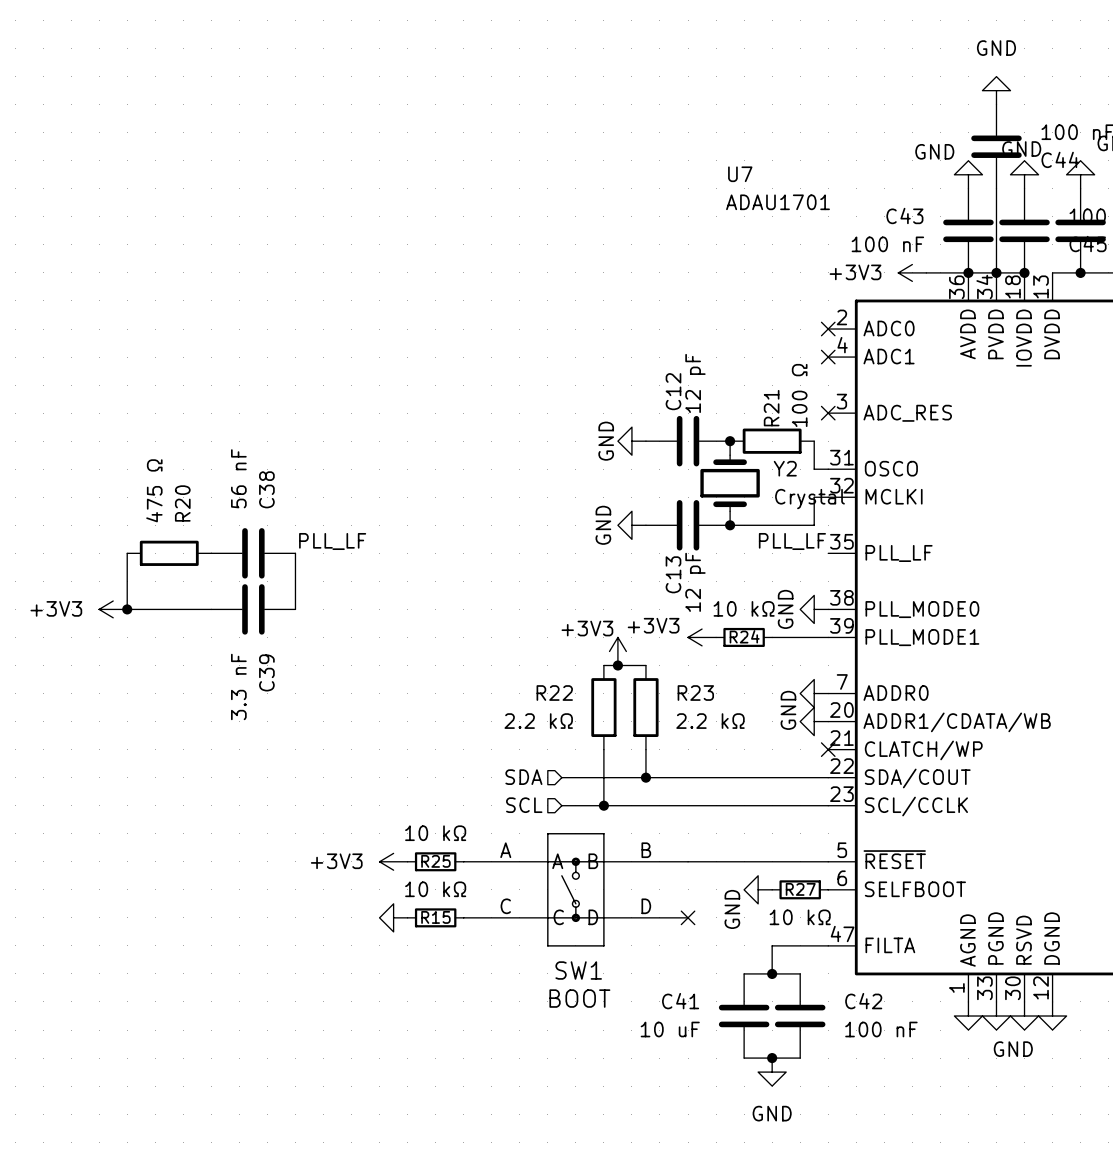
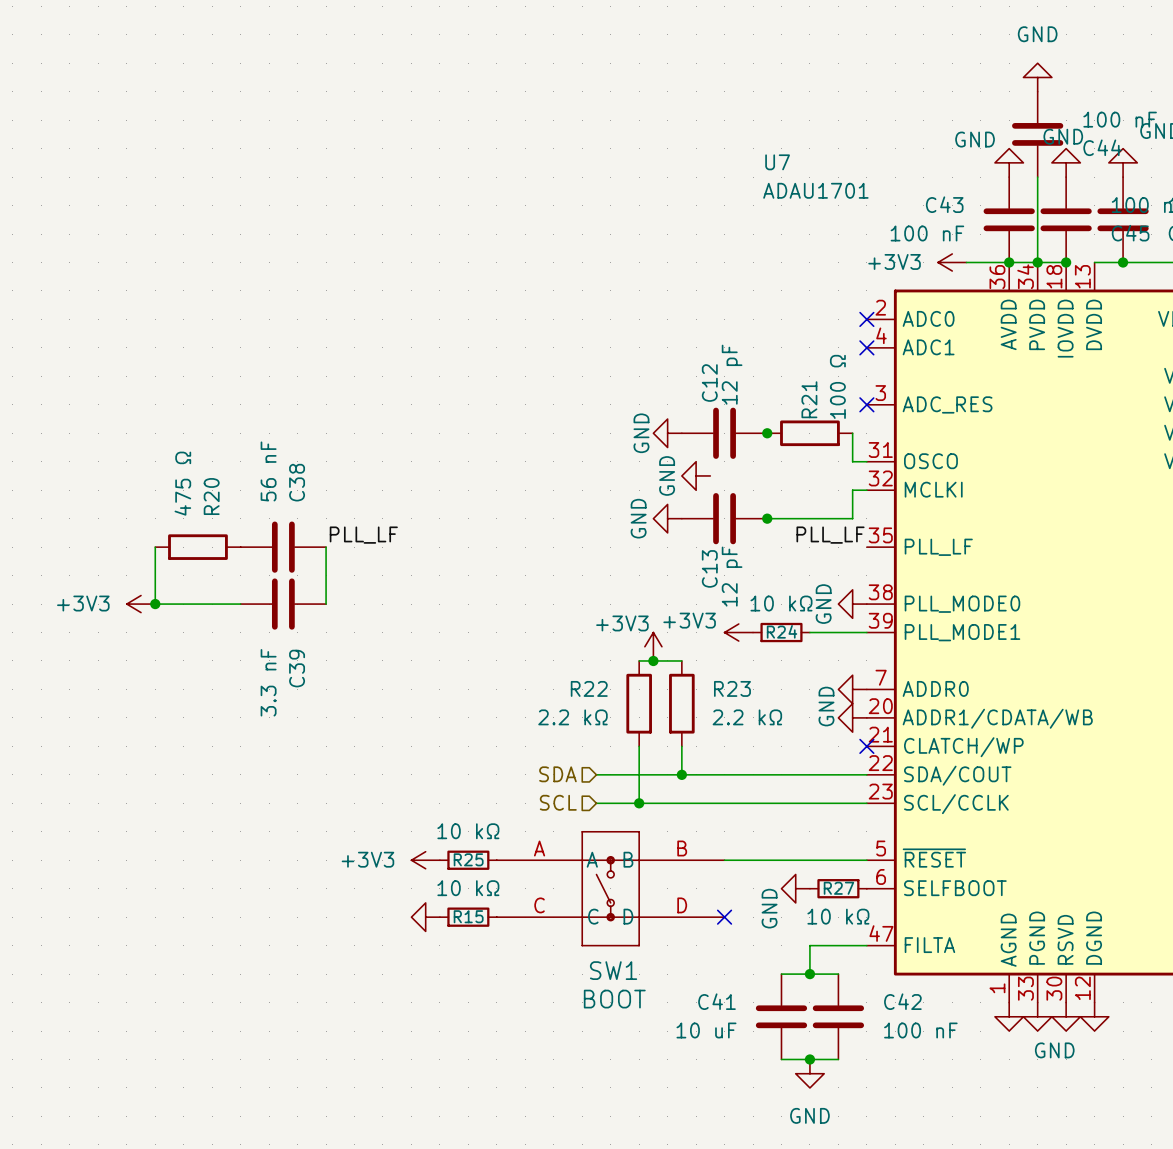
power symbol: none -> GND (696, 475)
Y2: Crystal (730, 483) -> none

